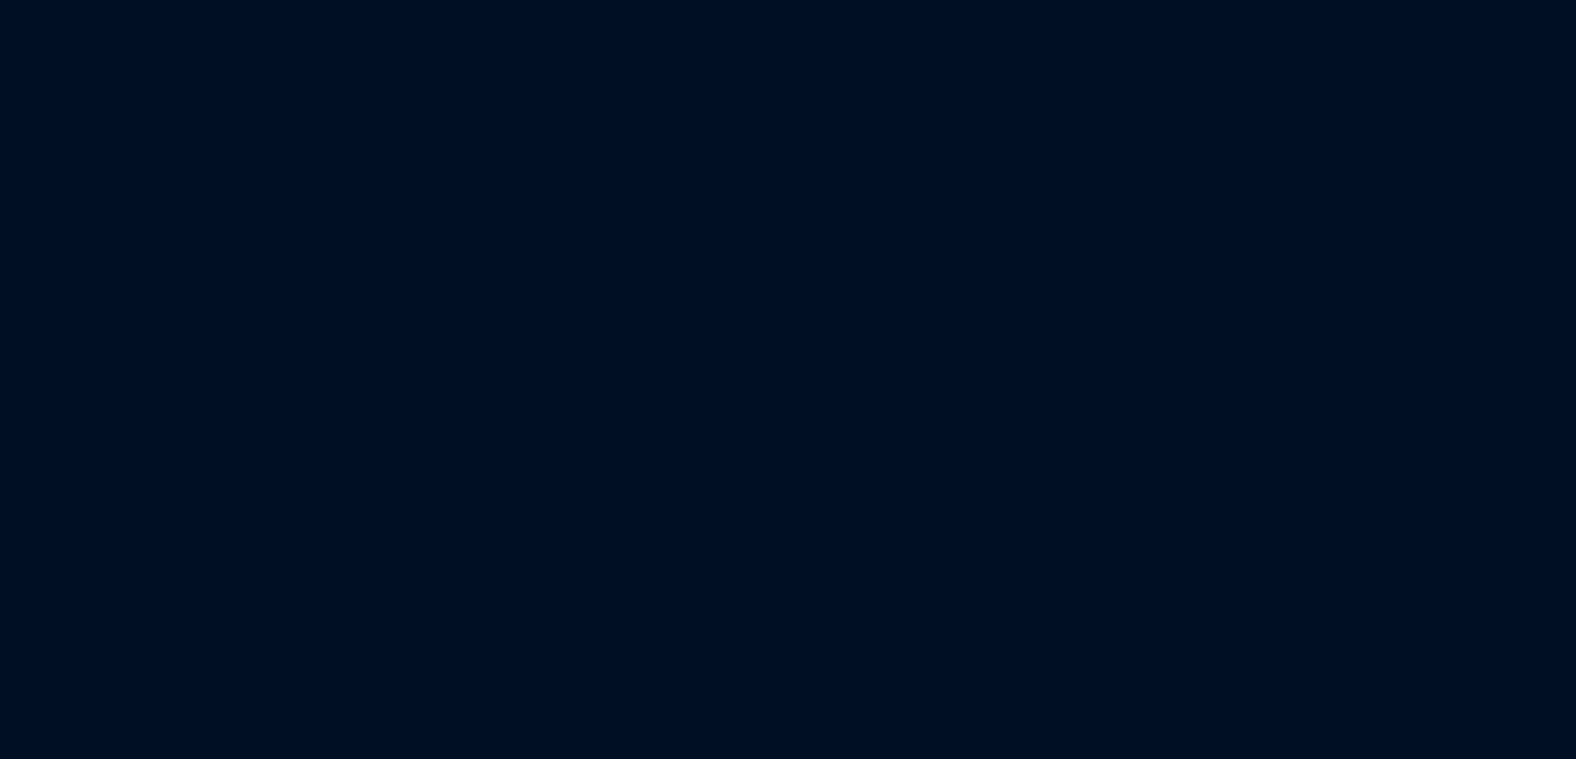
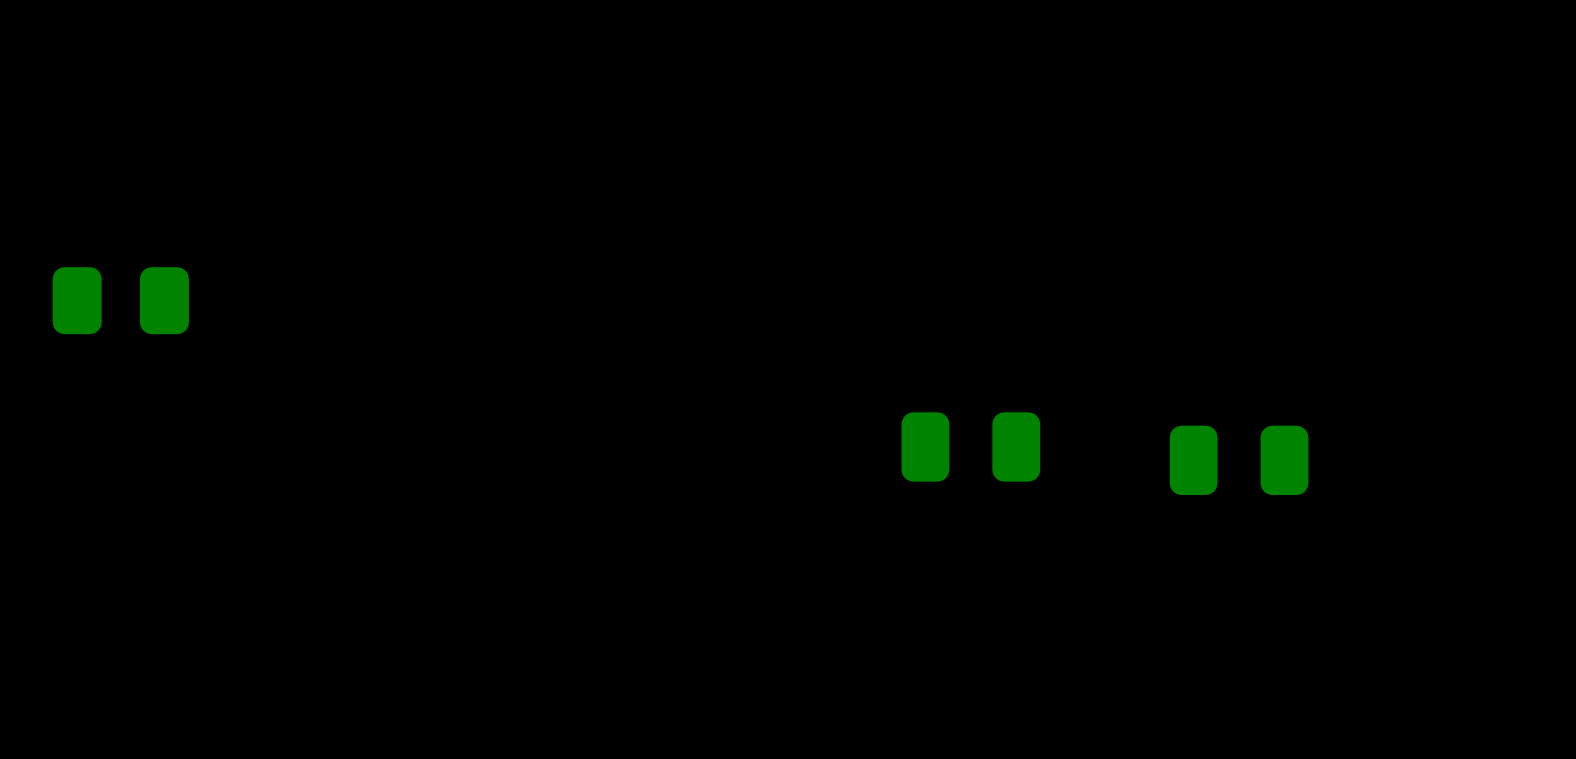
part: none -> (120, 300)
part: none -> (970, 446)
part: none -> (1239, 460)

